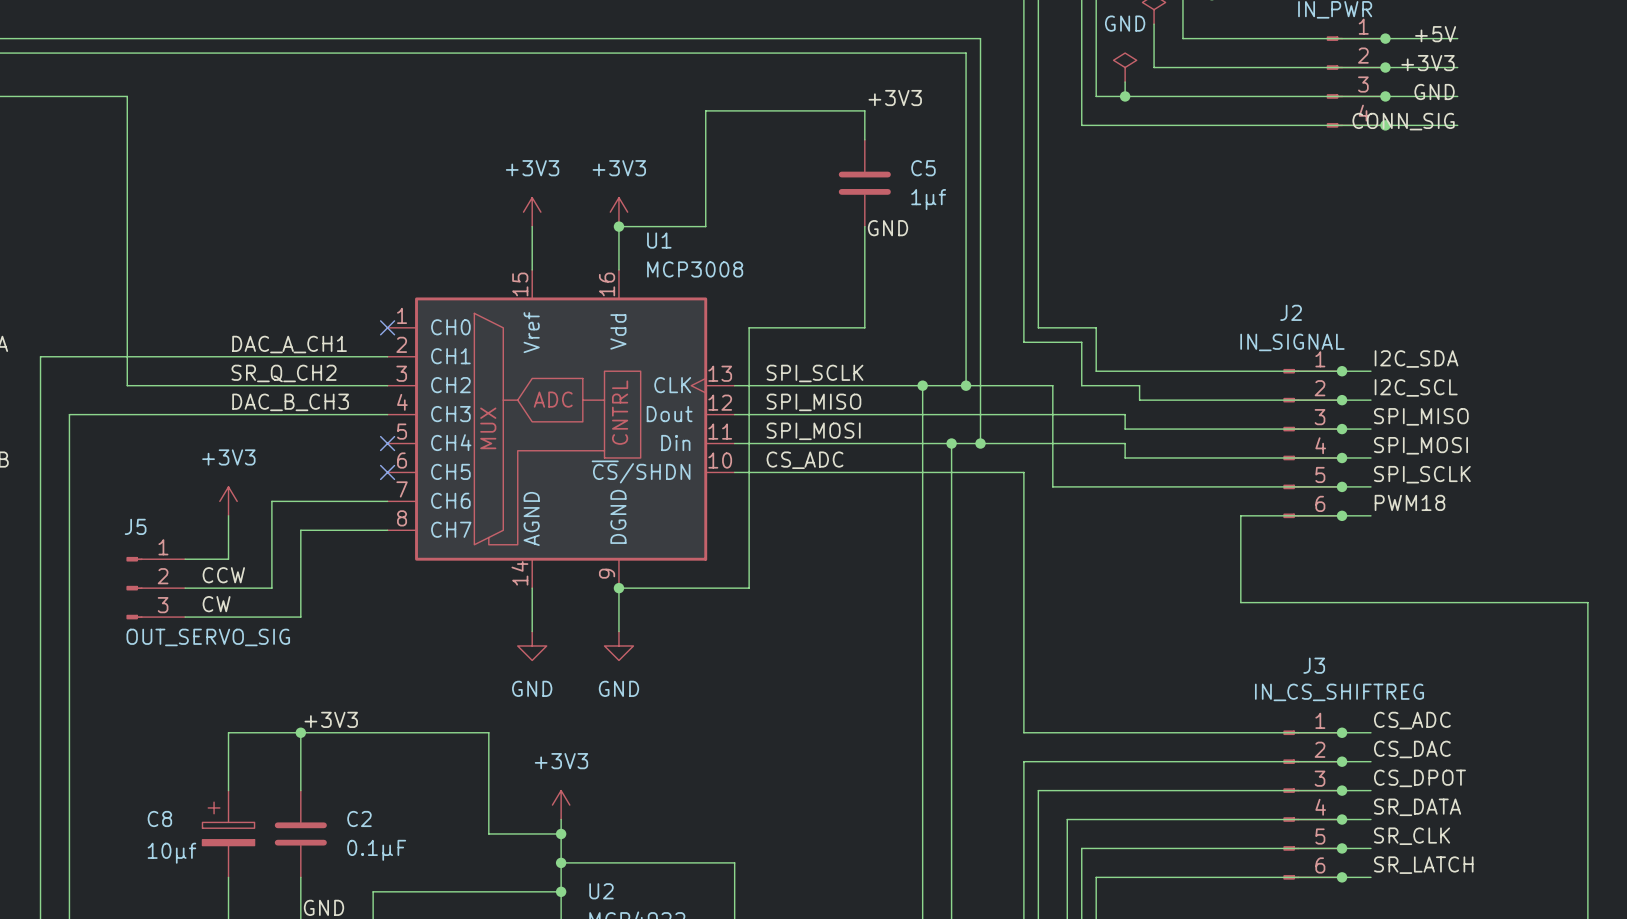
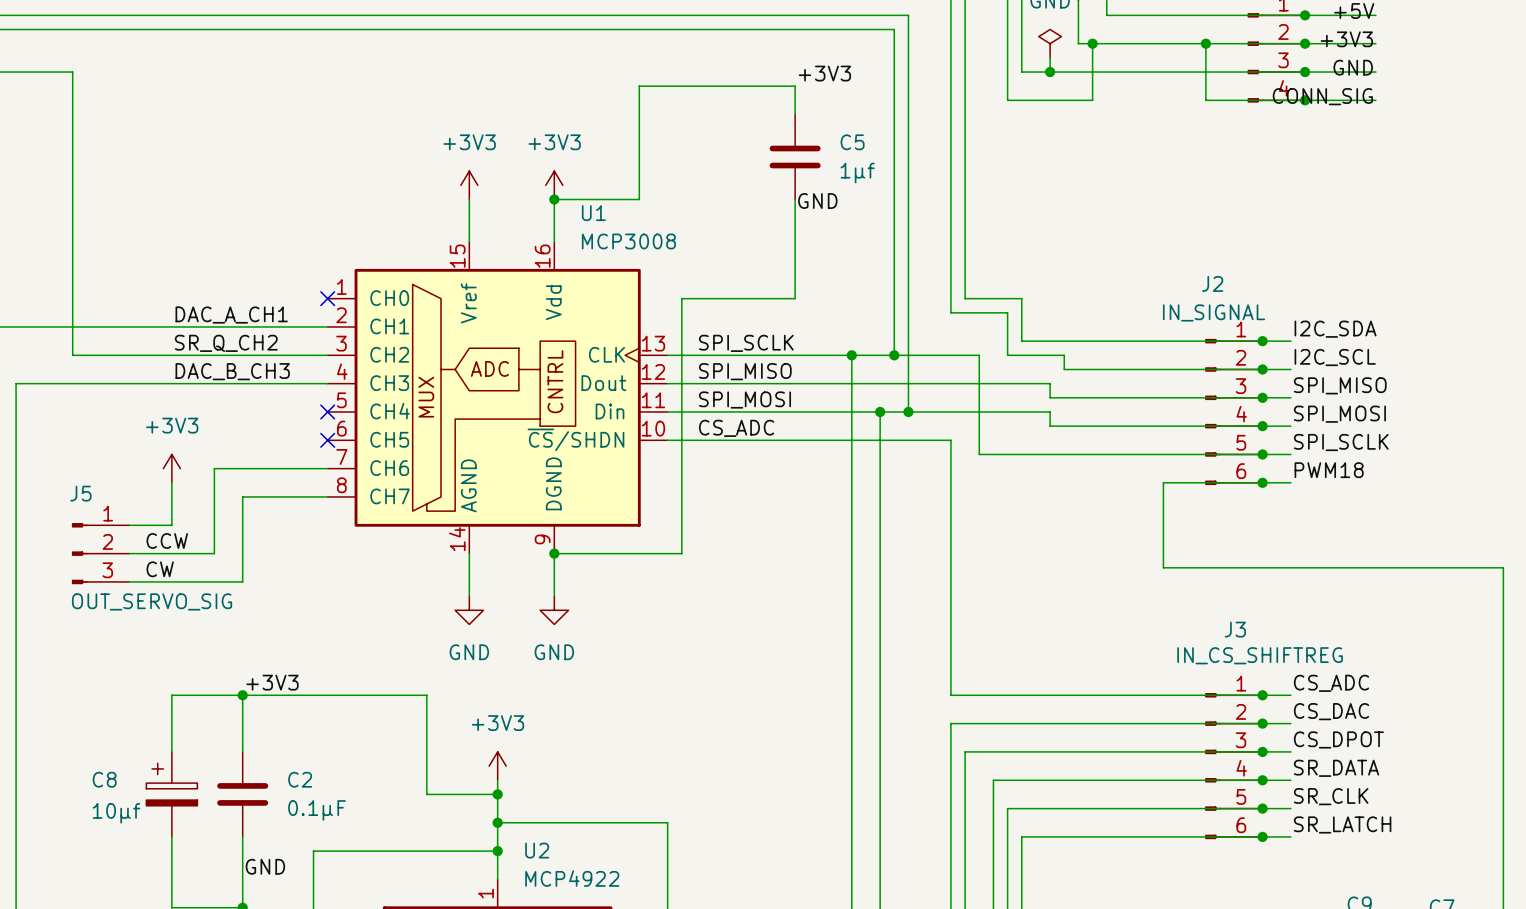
junction: none -> (1092, 43)
wire: none -> (1205, 43) (1205, 100)
junction: none -> (1205, 43)
wire: (1168, 125) (1284, 125) -> (1092, 100) (1092, 43)

